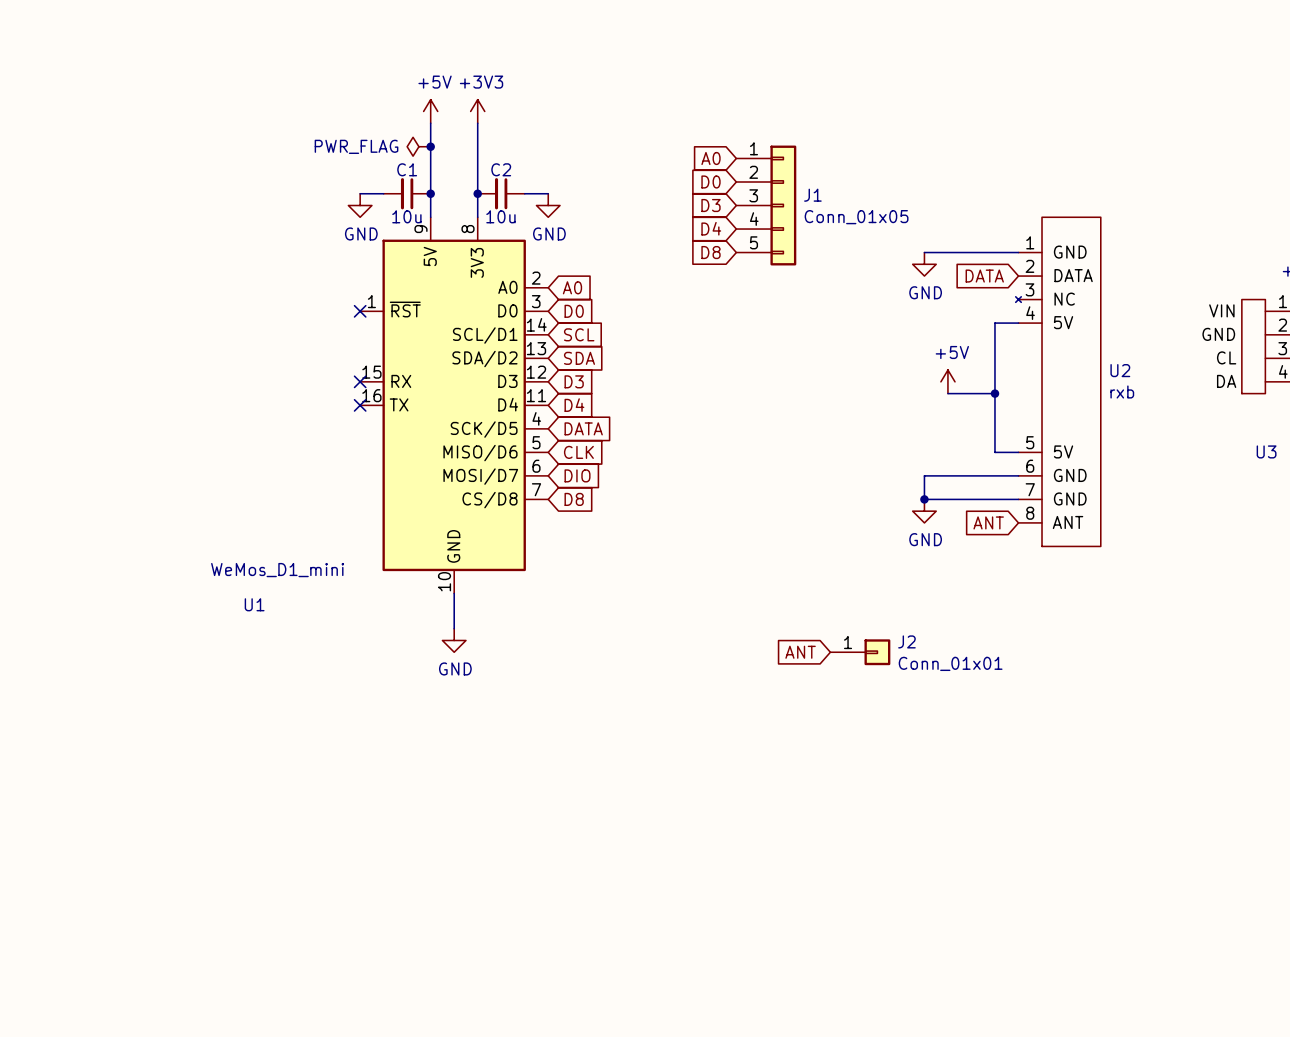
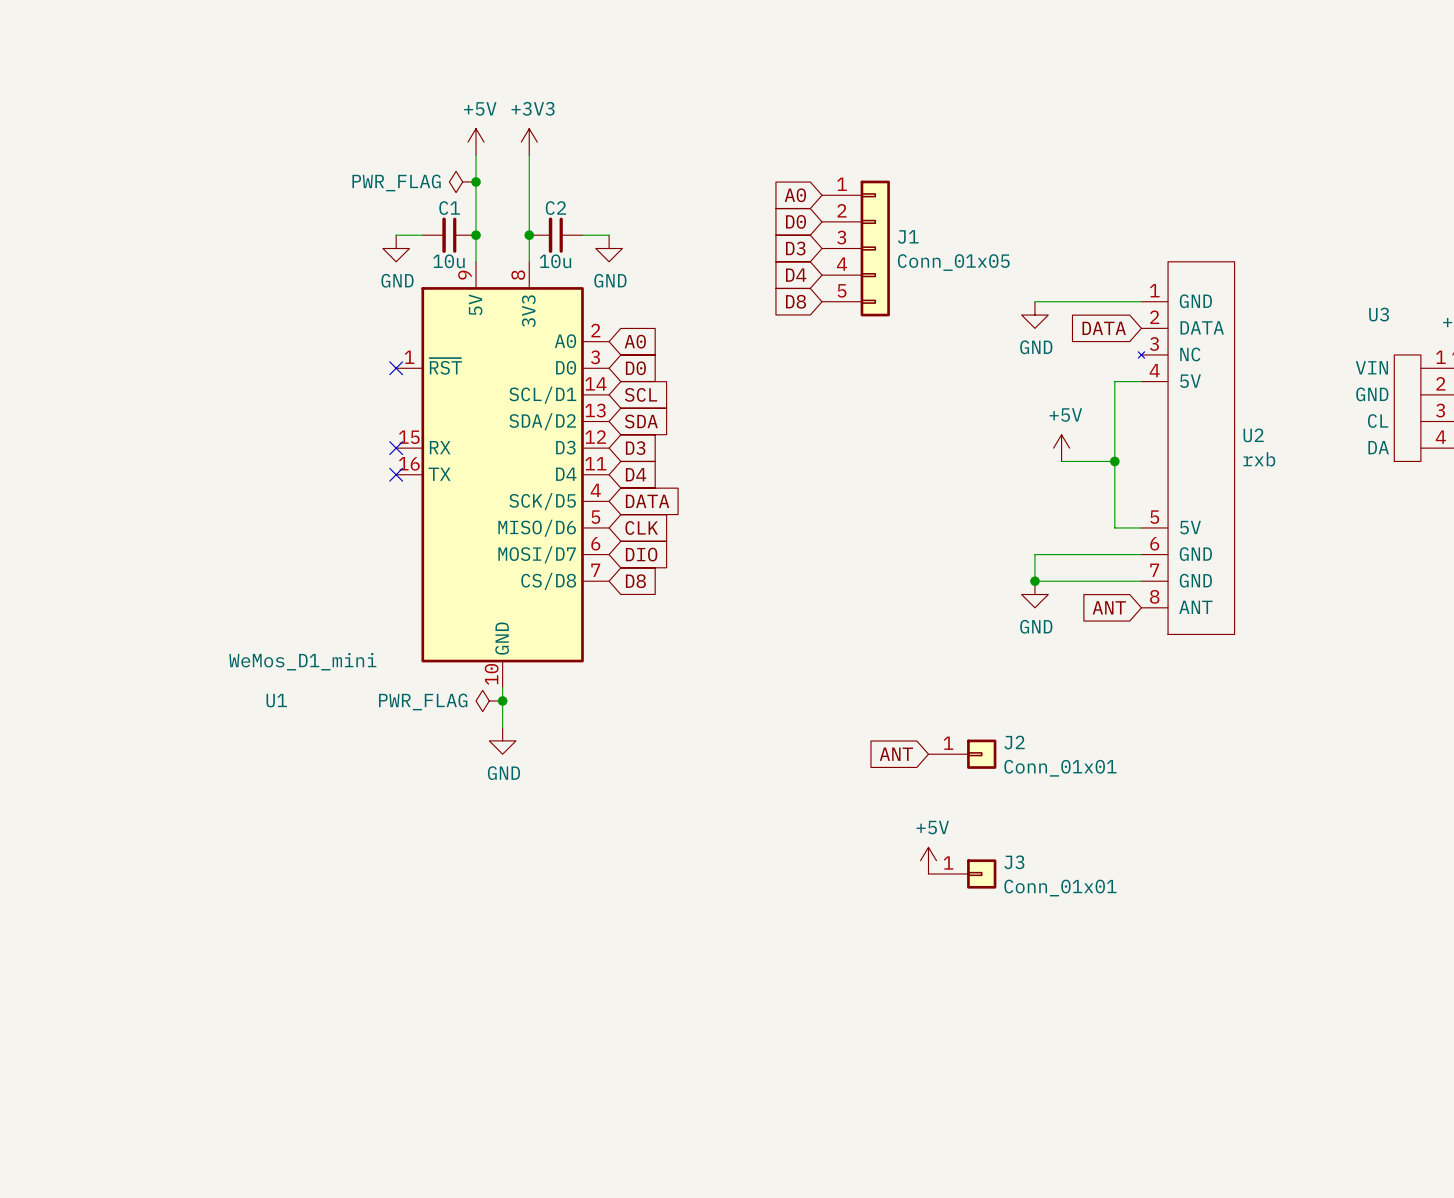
U3 name position: U3 (1266, 451) -> U3 (1379, 314)
power symbol: none -> PWR_FLAG (489, 700)
junction: none -> (502, 700)
power symbol: none -> +5V (928, 860)
J3: none -> Conn_01x01 (962, 873)

